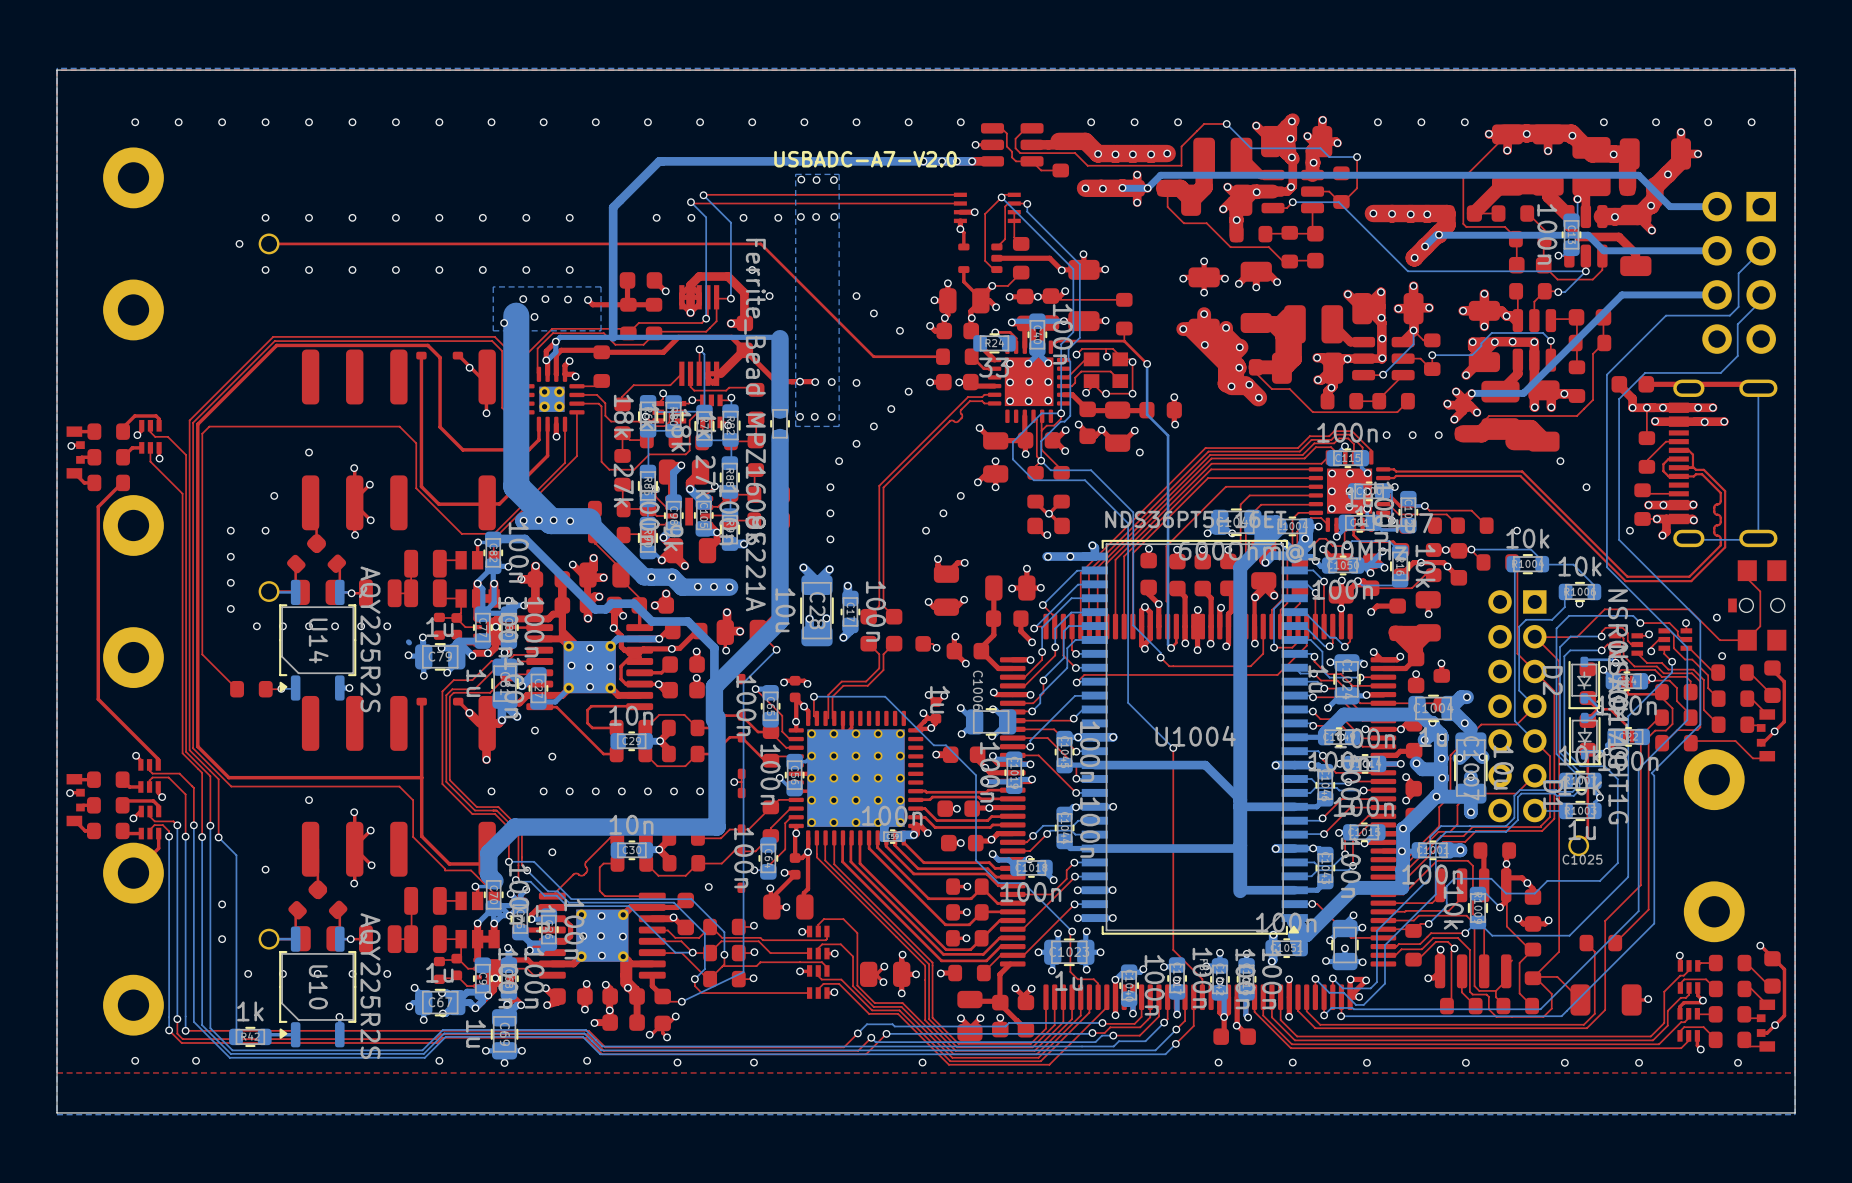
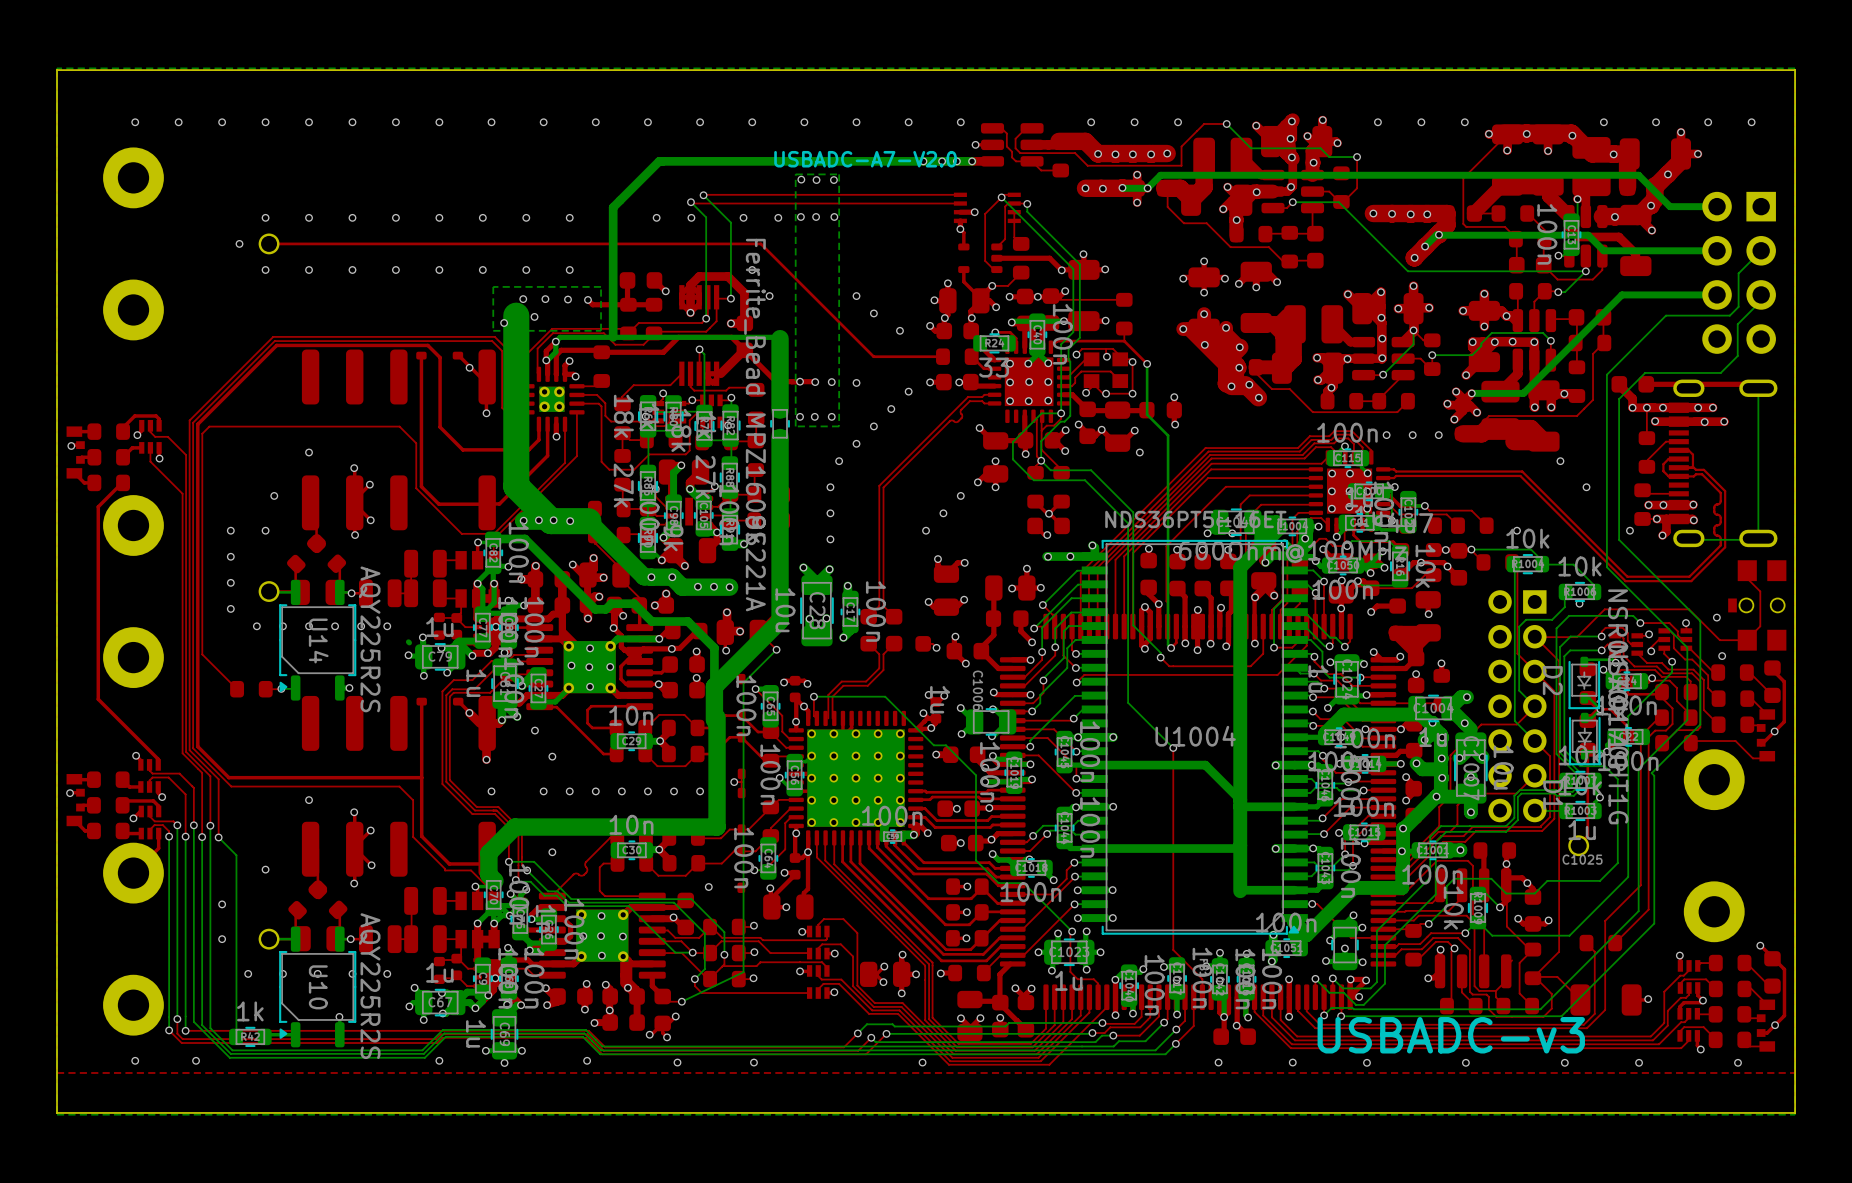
text: none -> USBADC-v3 (1451, 1035)

